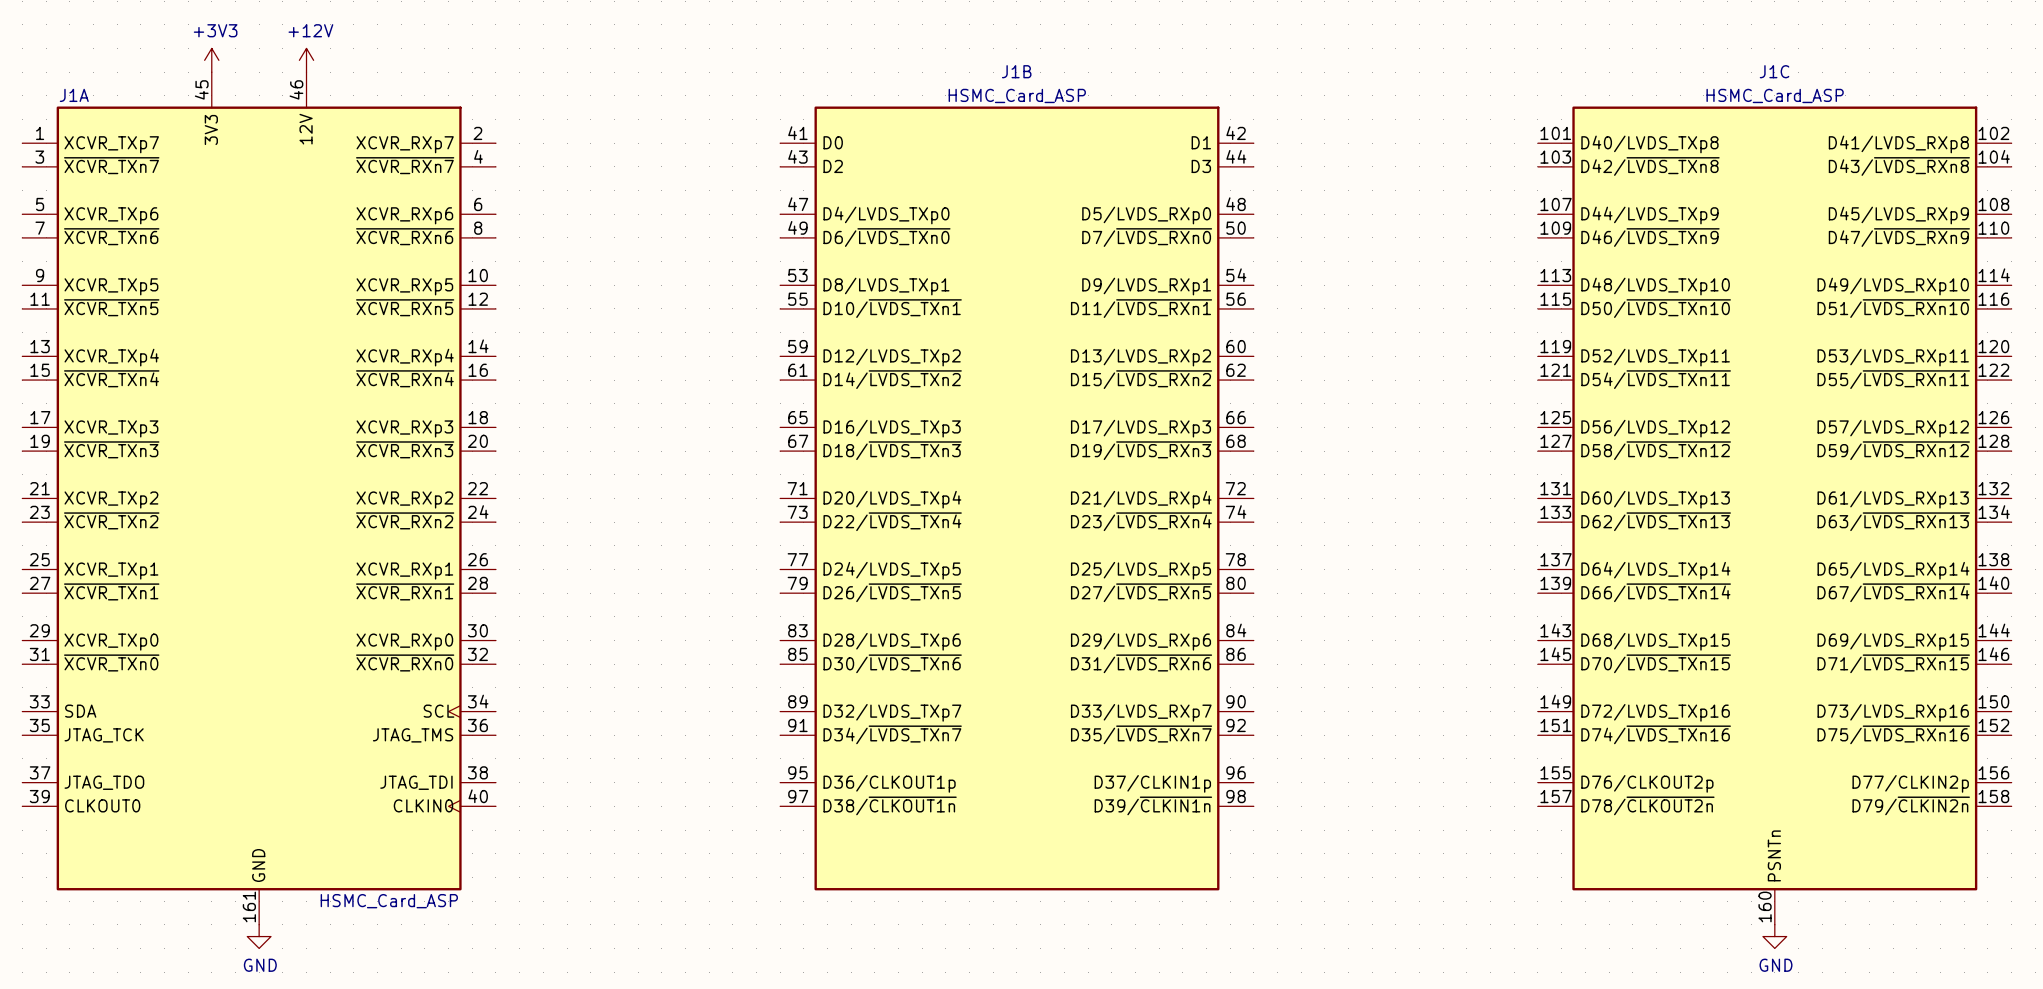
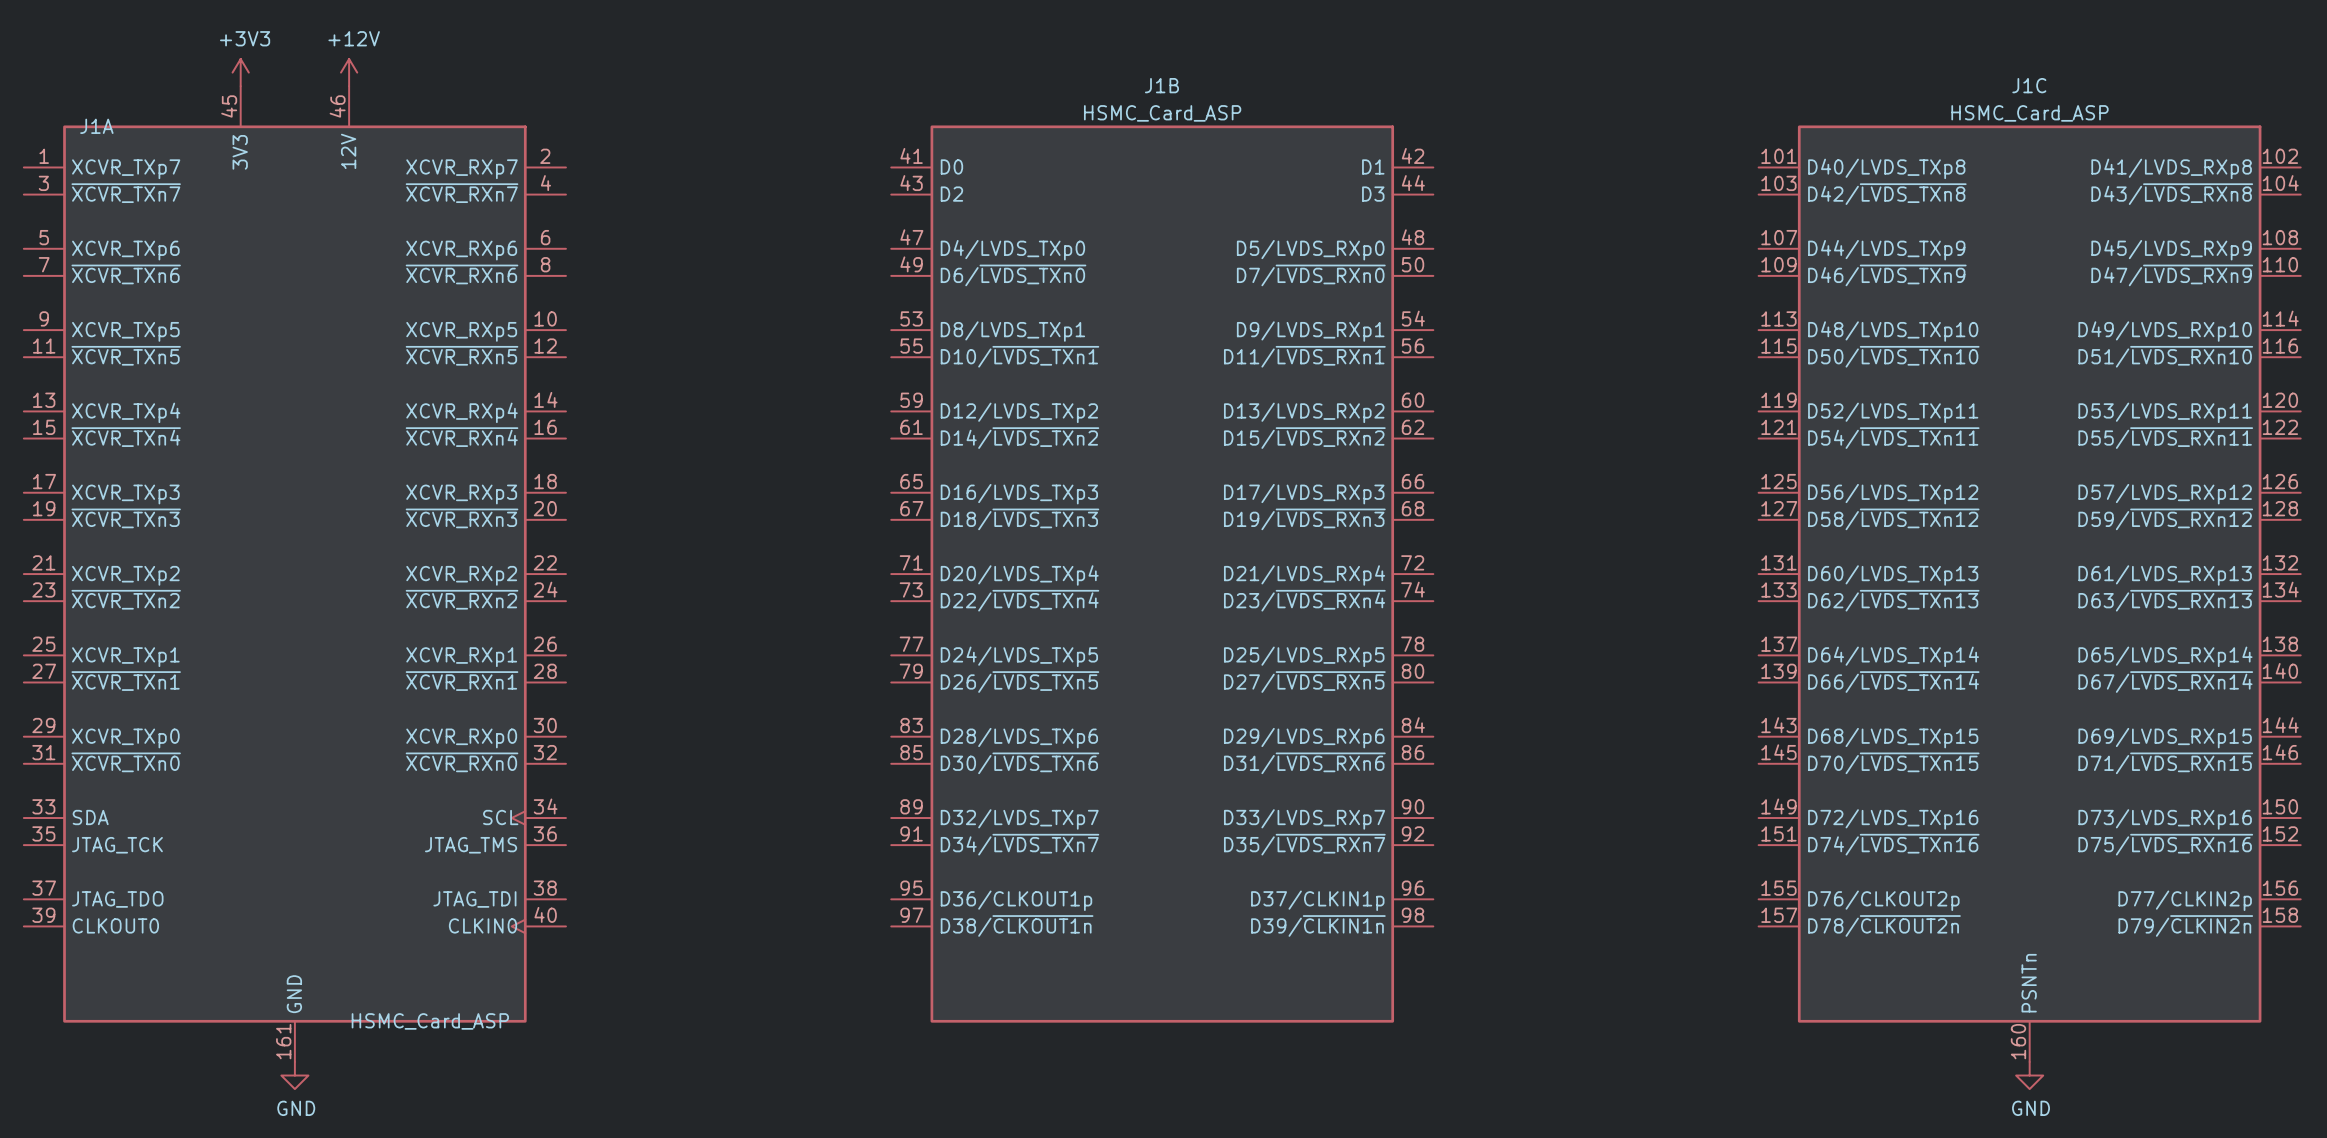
J1A name position: J1A (74, 95) -> J1A (96, 126)
J1A value position: HSMC_Card_ASP (389, 901) -> HSMC_Card_ASP (430, 1021)

